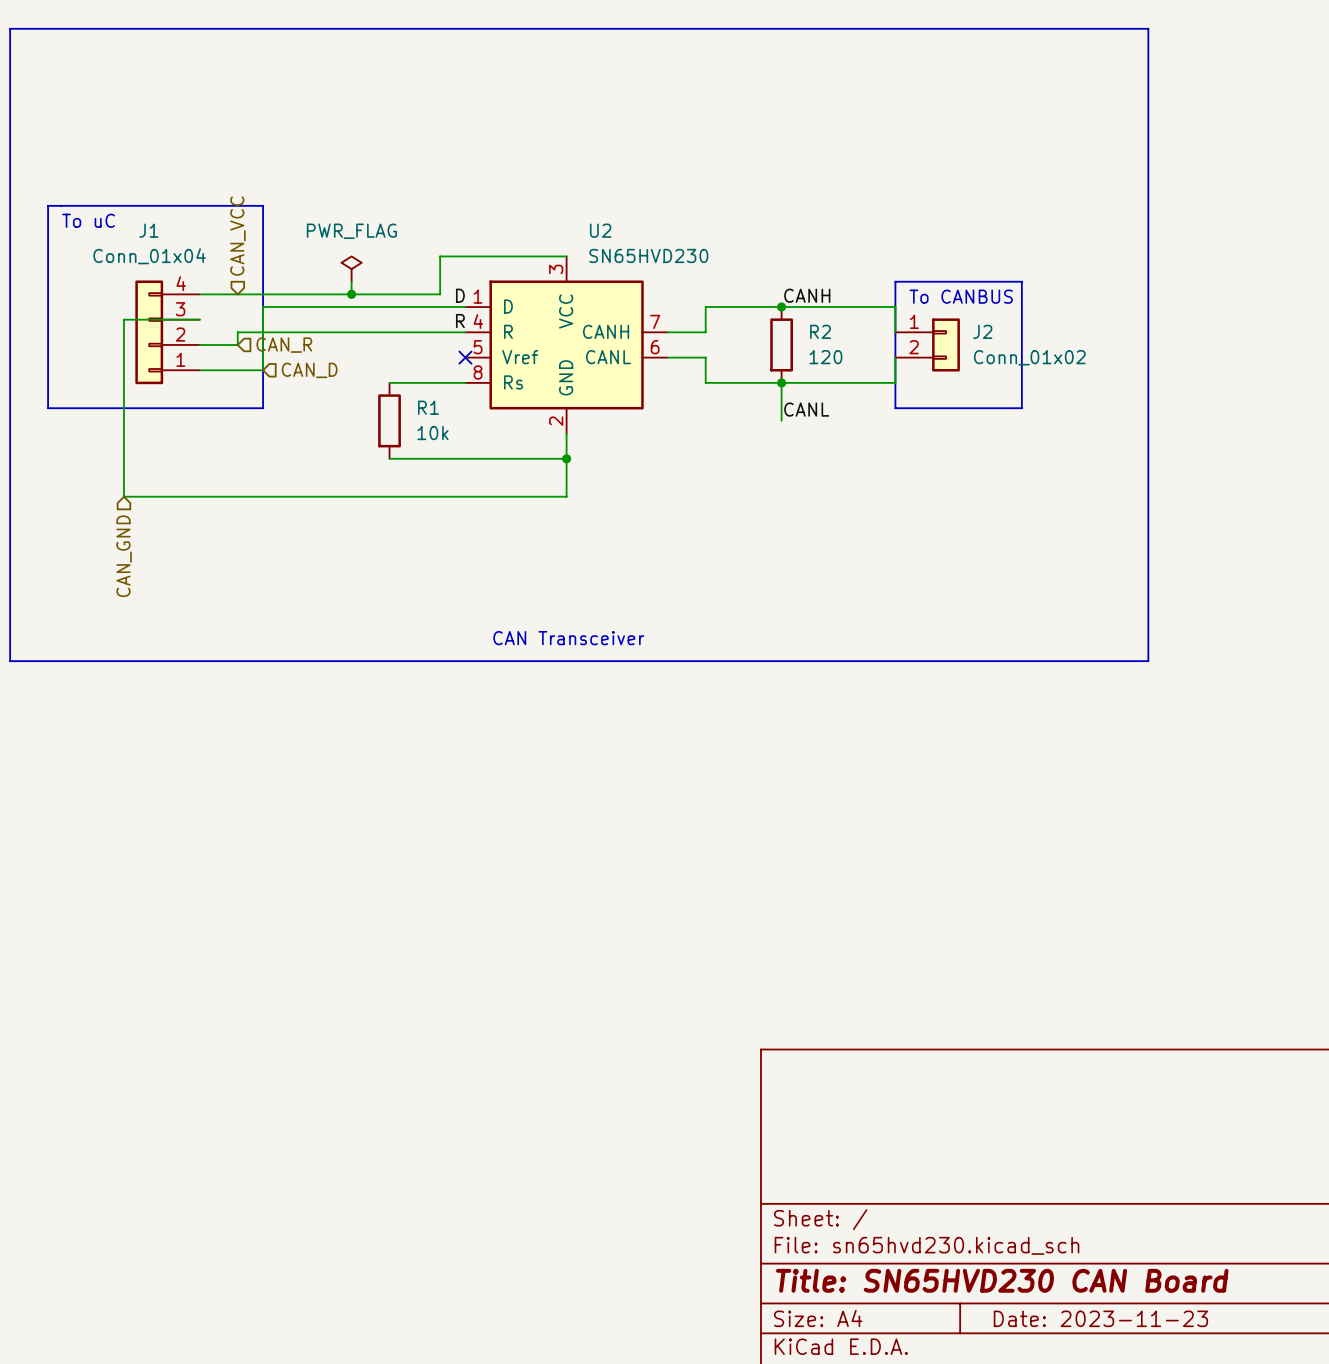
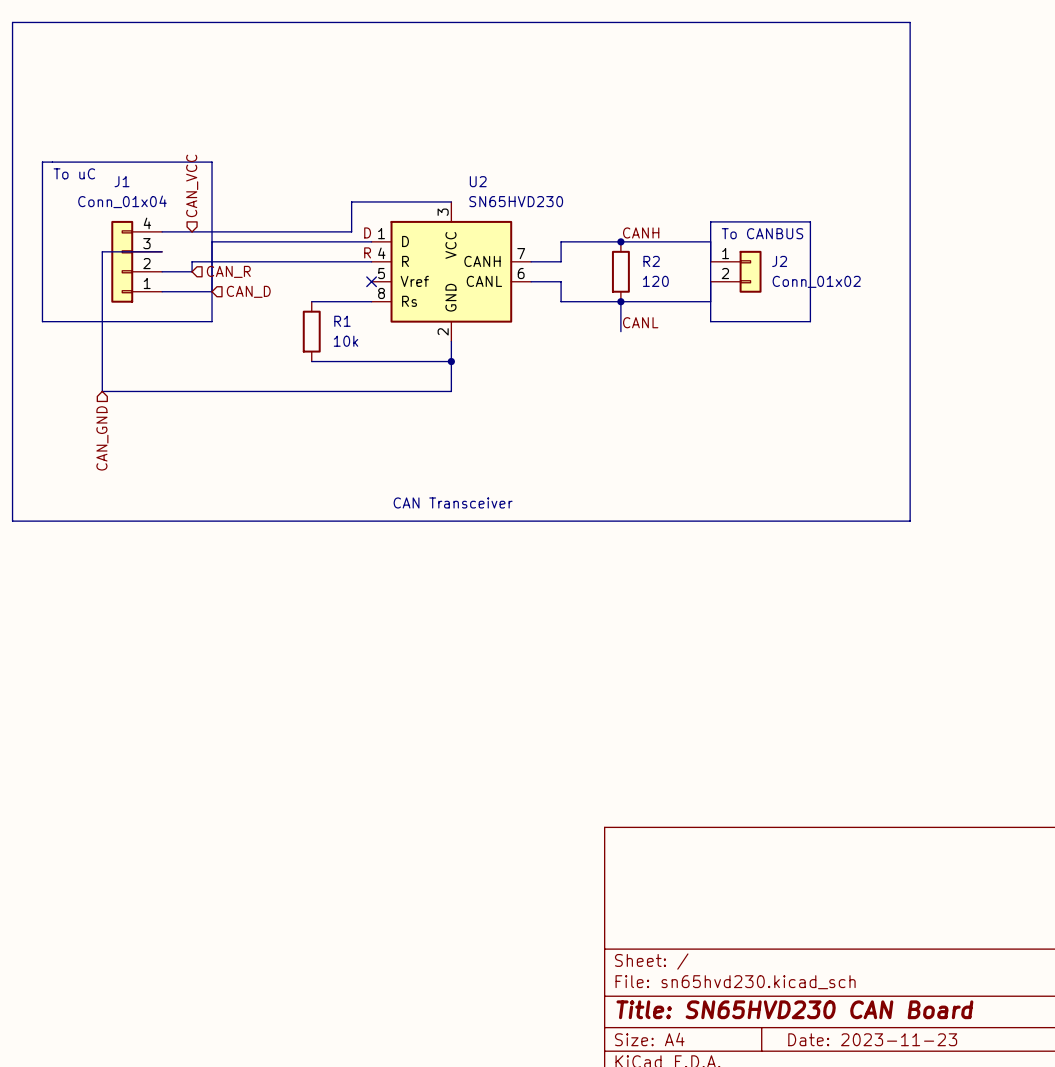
power symbol: PWR_FLAG (351, 269) -> none
wire: (351, 281) (351, 294) -> none
junction: (351, 294) -> none

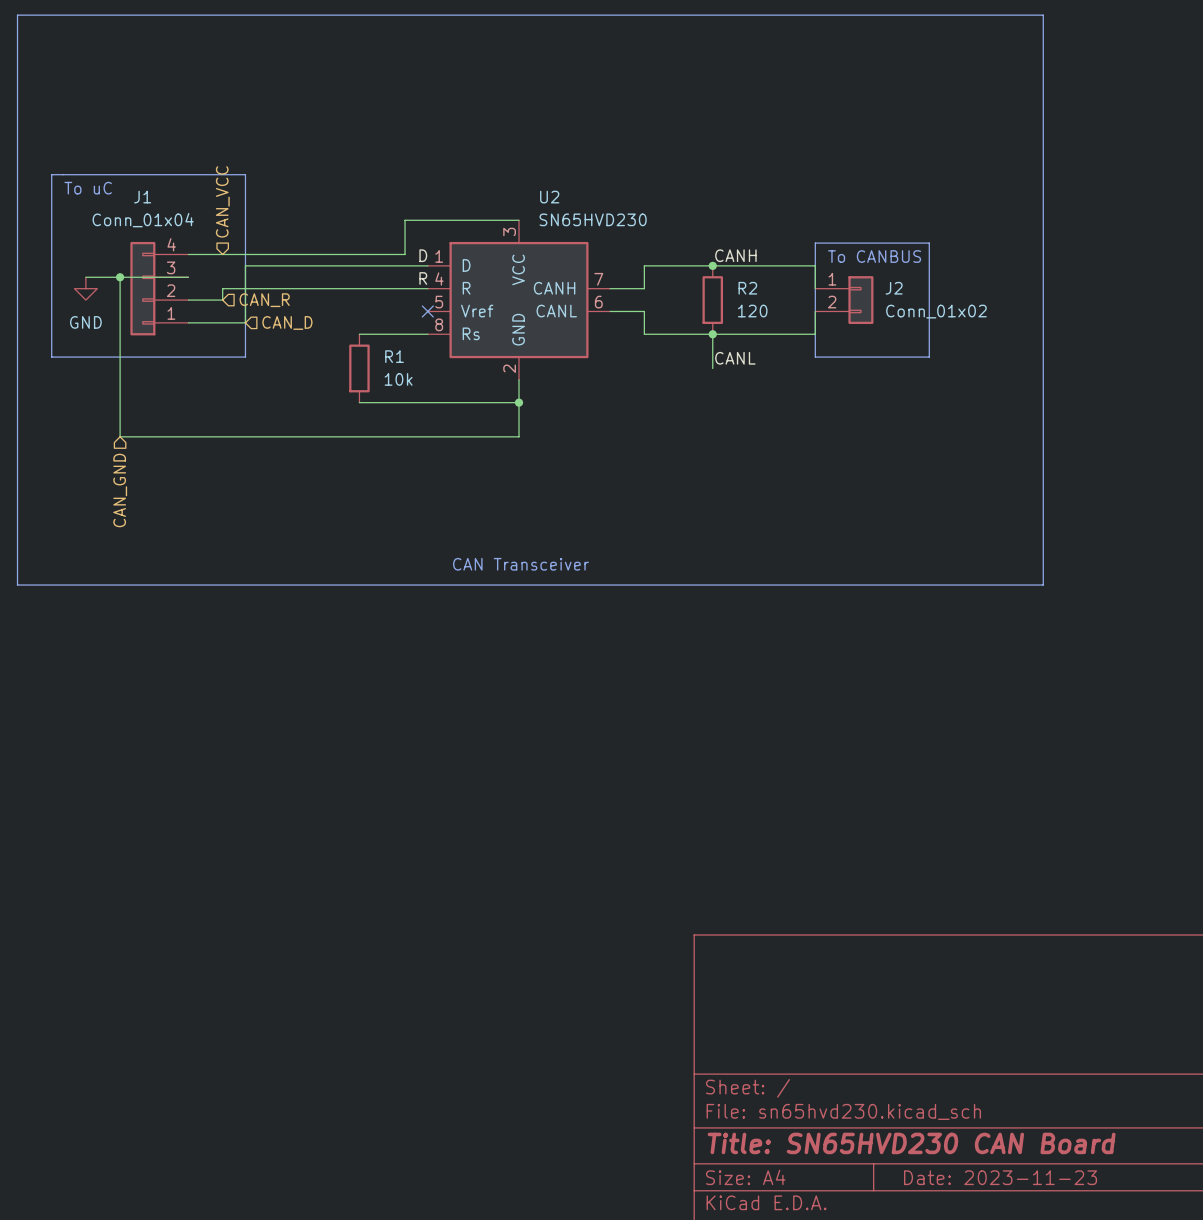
wire: none -> (85, 277) (120, 277)
junction: none -> (120, 277)
power symbol: none -> GND (85, 288)

